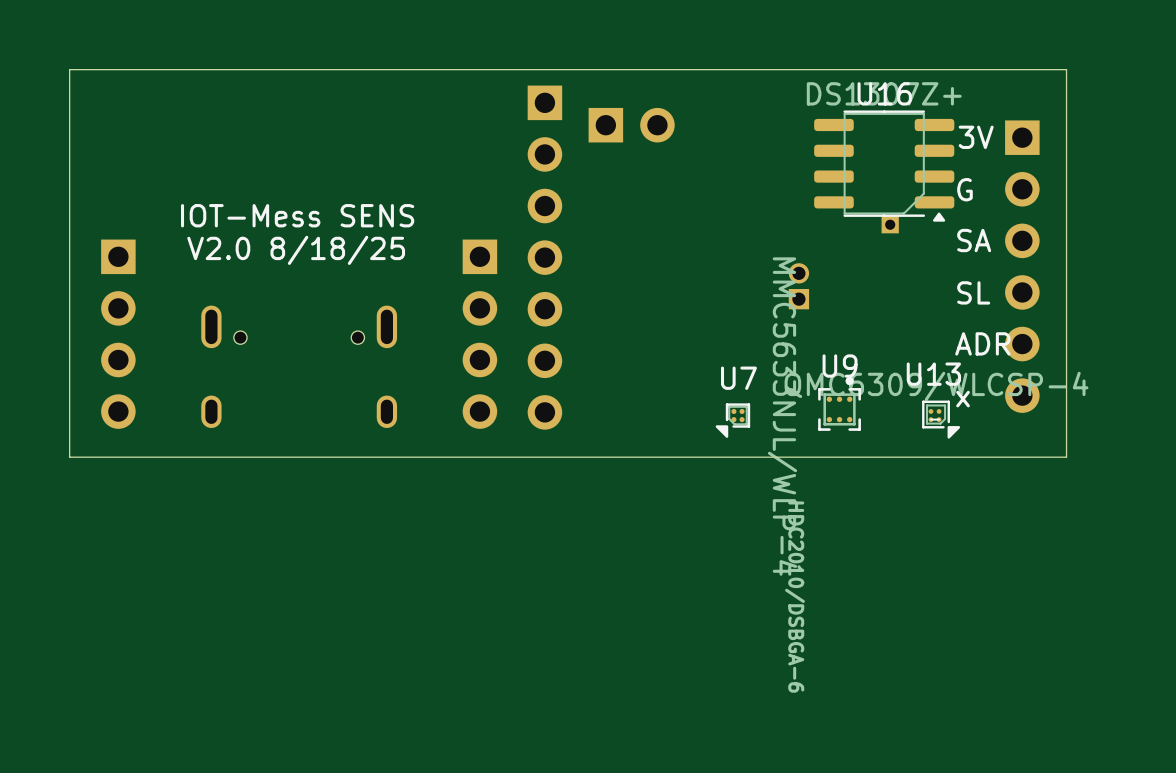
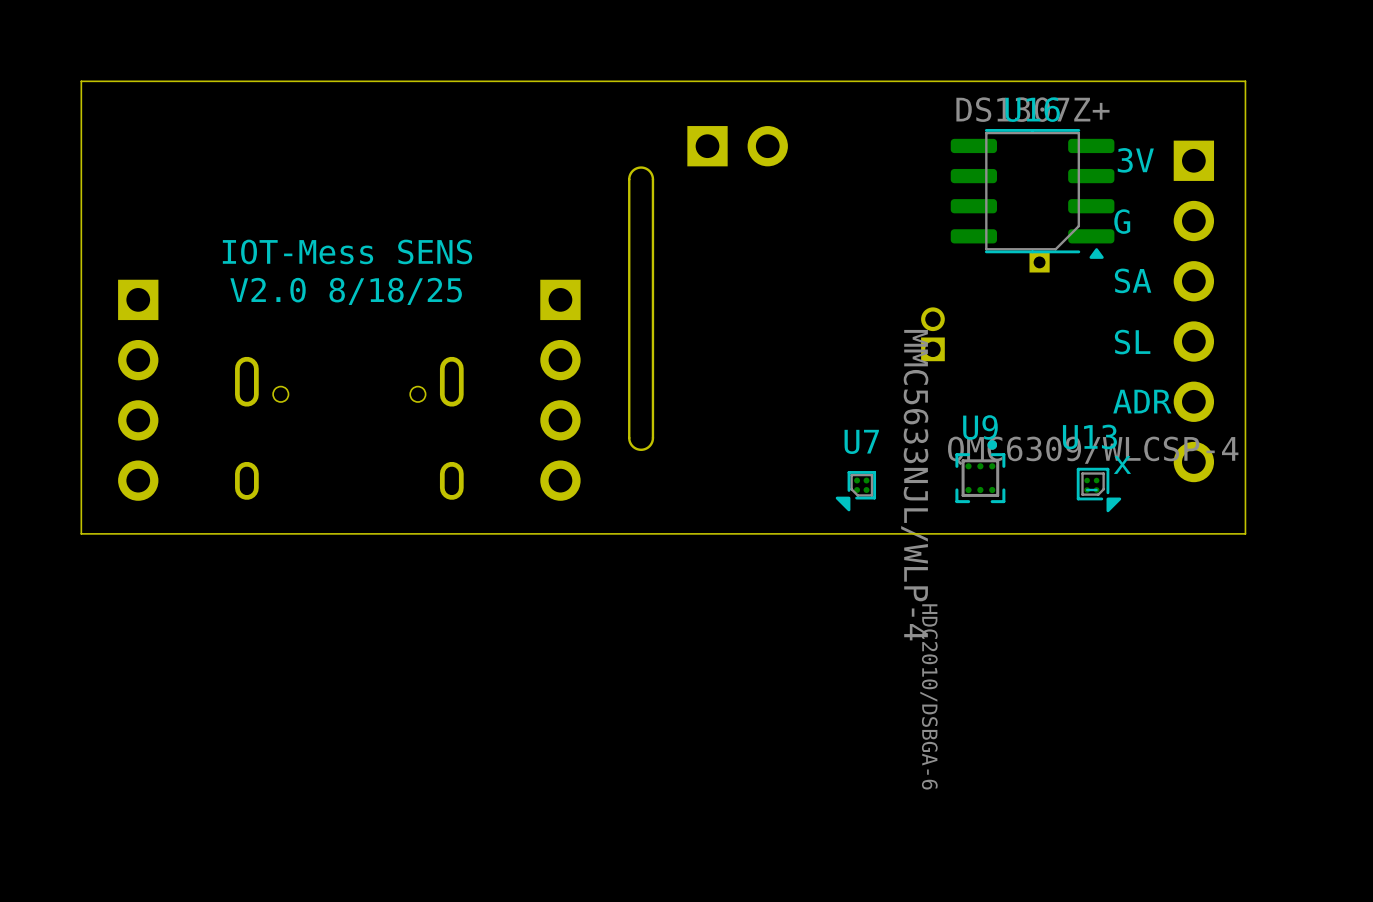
board edge: none -> (652, 179) (652, 437) (649, 445) (641, 449) (633, 446) (629, 437) (629, 179) (633, 170) (641, 167) (648, 170) (652, 179)
part: (544, 257) -> none

